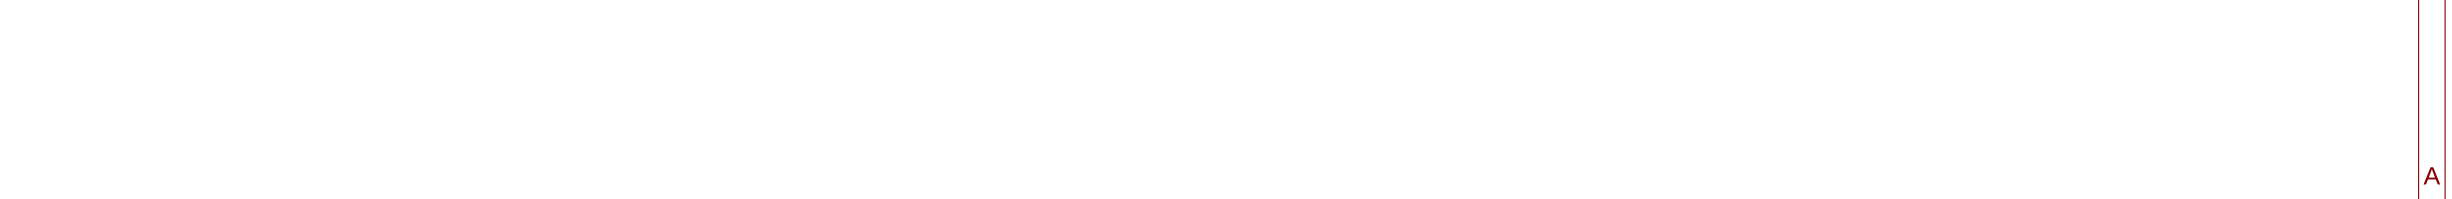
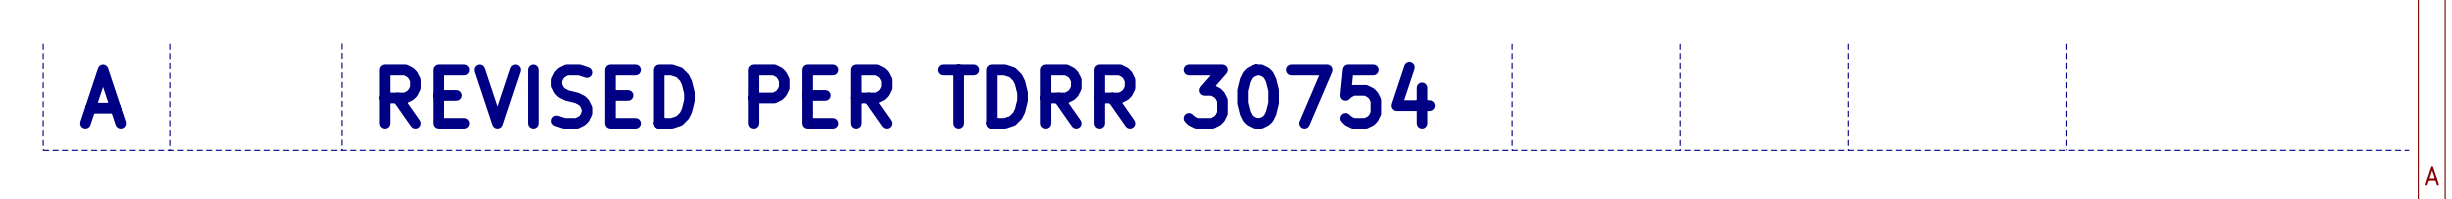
line: none -> (43, 43) (43, 150) (2409, 150)
line: none -> (170, 43) (170, 150)
line: none -> (341, 43) (341, 149)
line: none -> (1512, 43) (1512, 150)
line: none -> (1680, 43) (1680, 150)
line: none -> (1848, 43) (1848, 150)
line: none -> (2066, 43) (2066, 150)
text: none -> A REVISED PER TDRR 30754 (757, 95)

